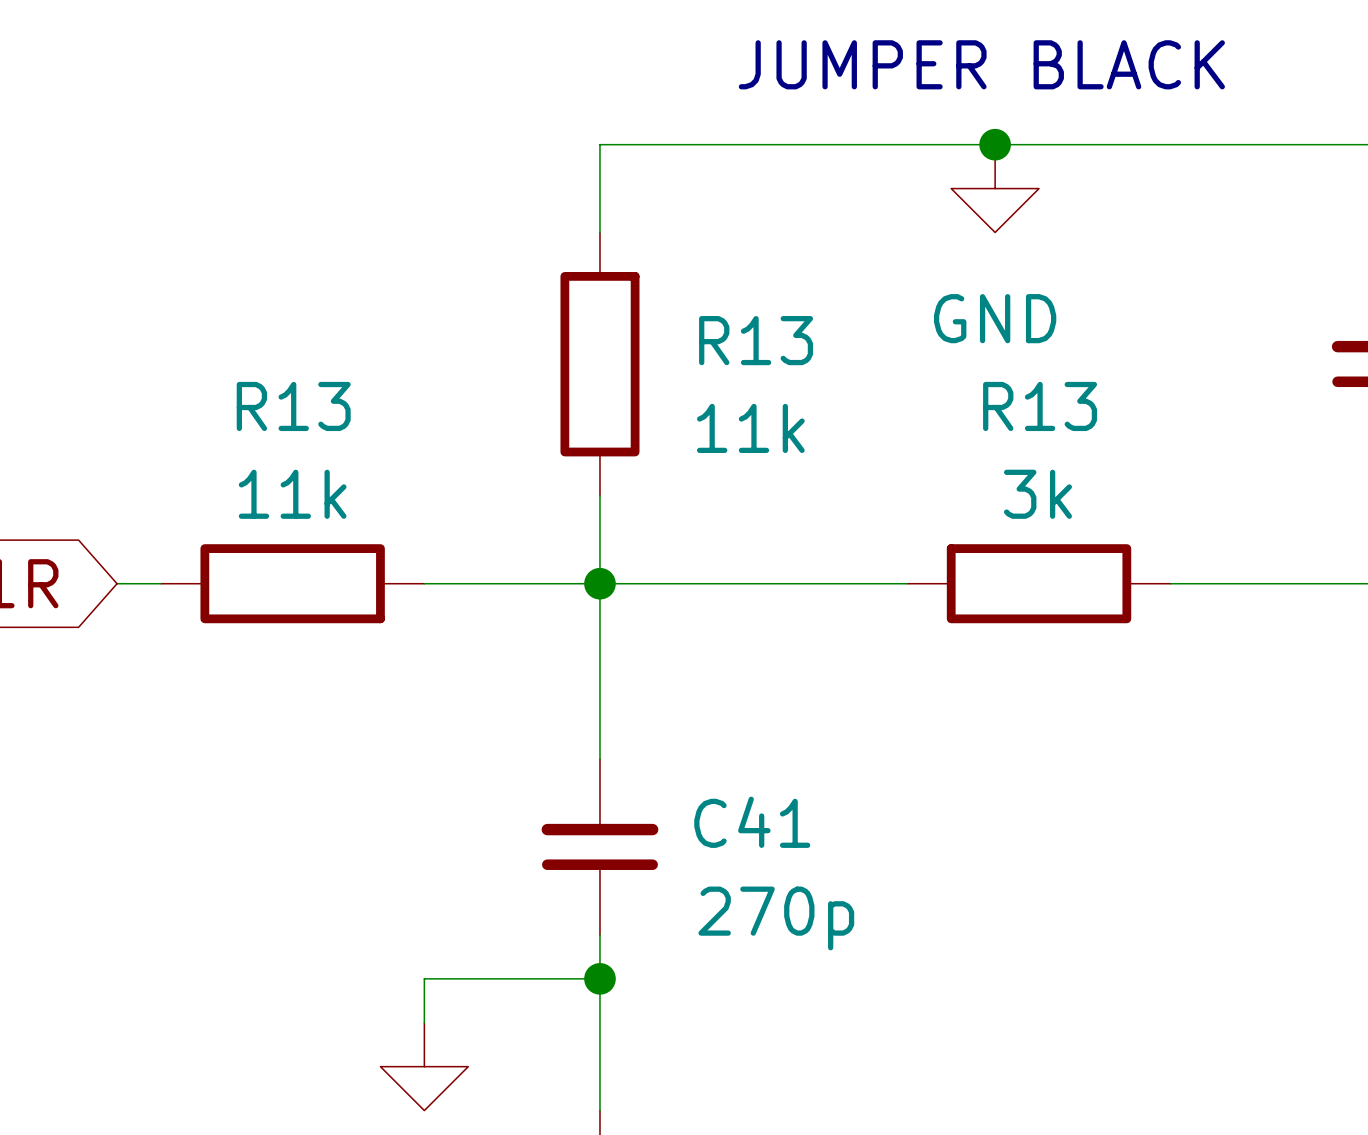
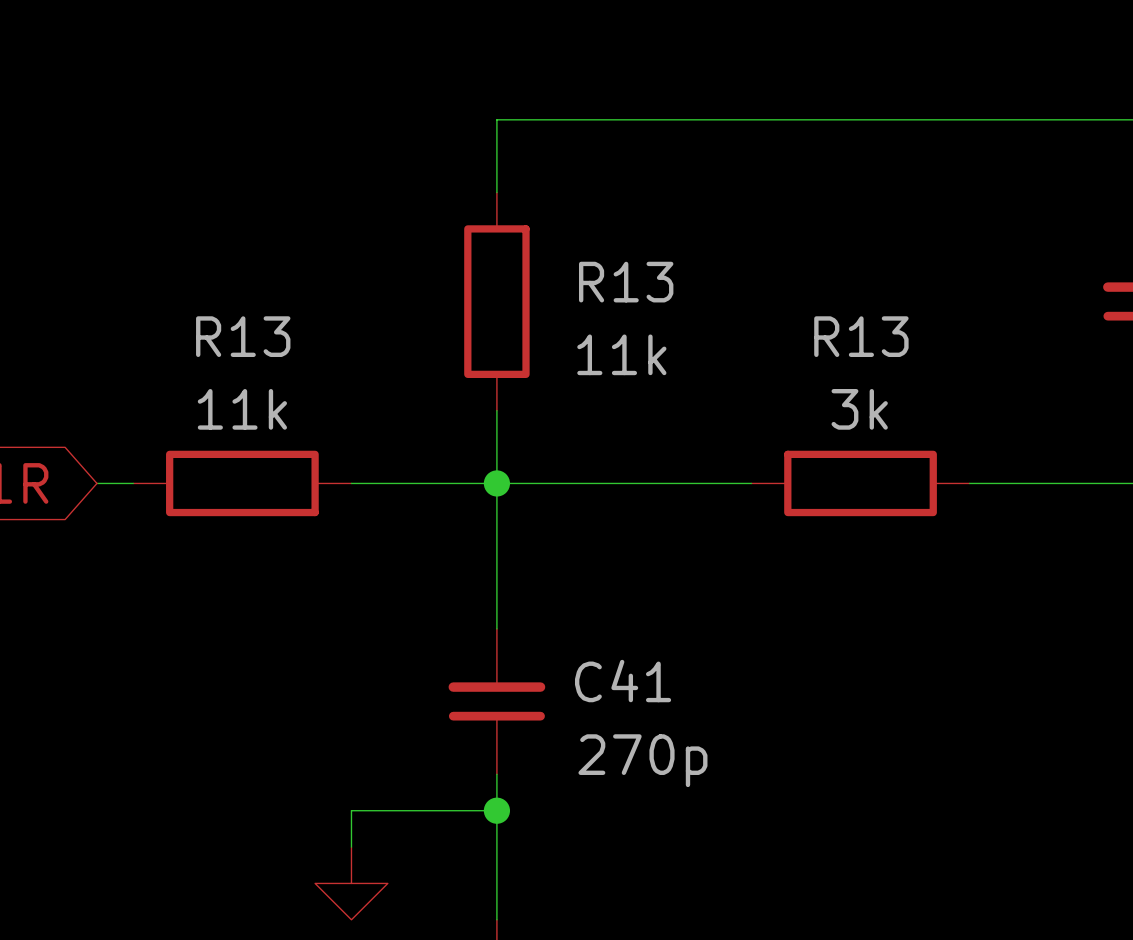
text: JUMPER BLACK (981, 64) -> none
junction: (995, 144) -> none
power symbol: GND (995, 188) -> none

